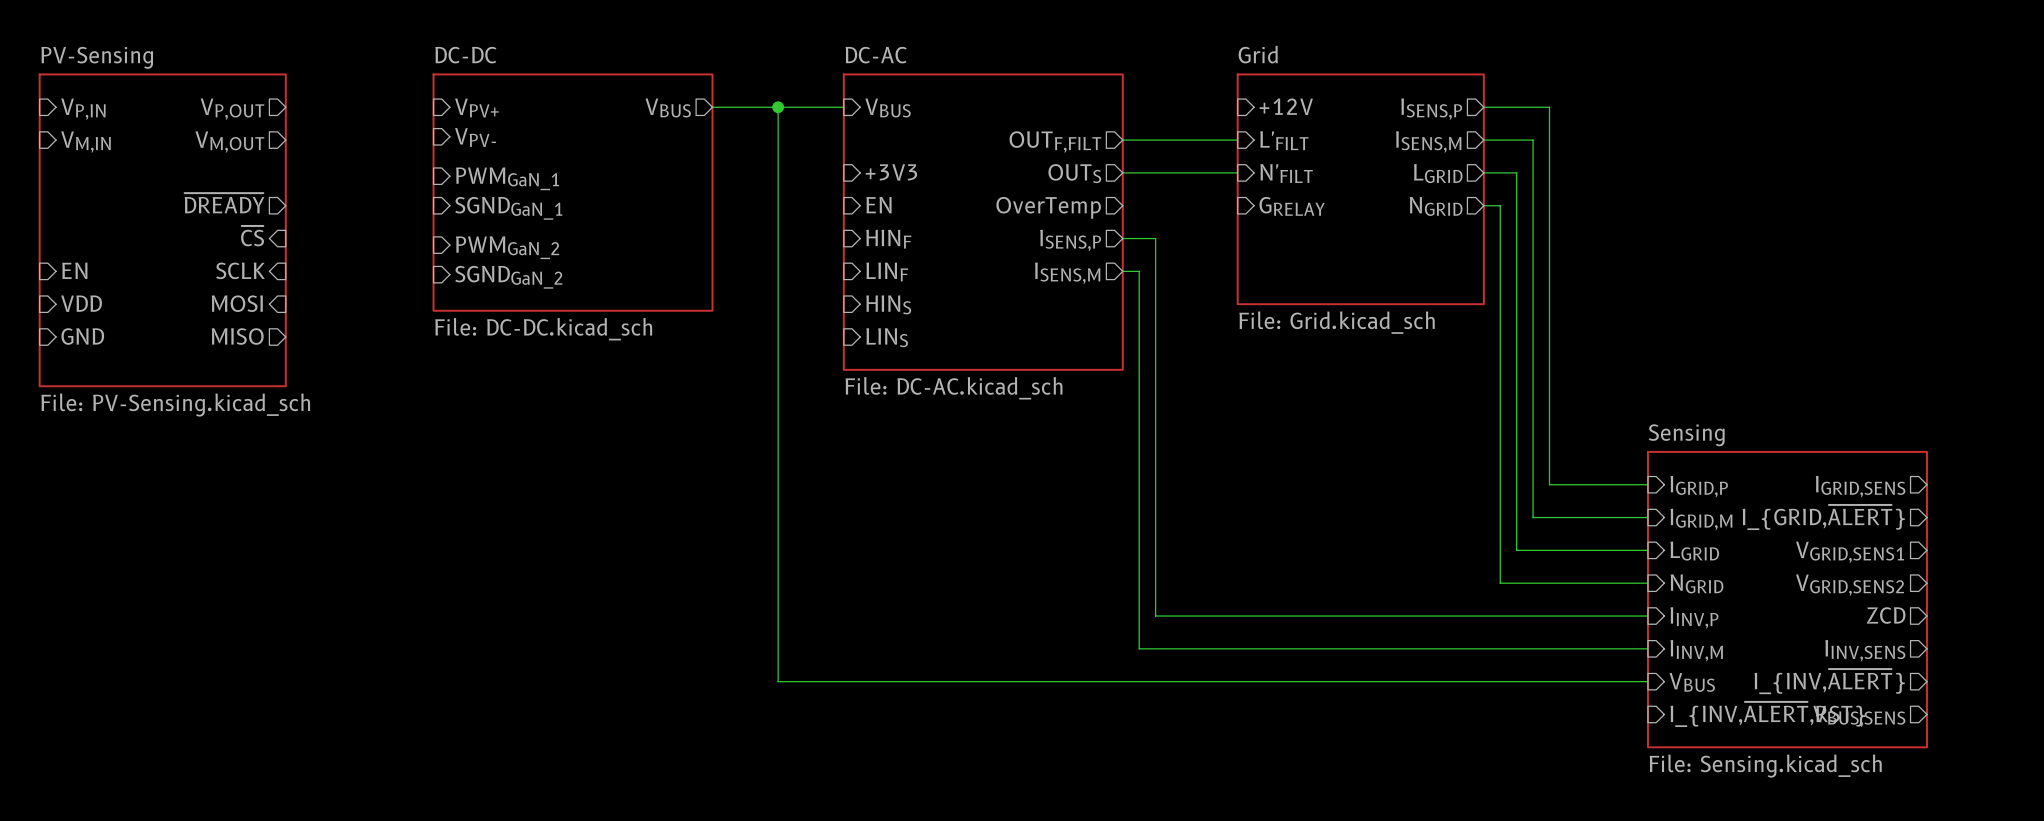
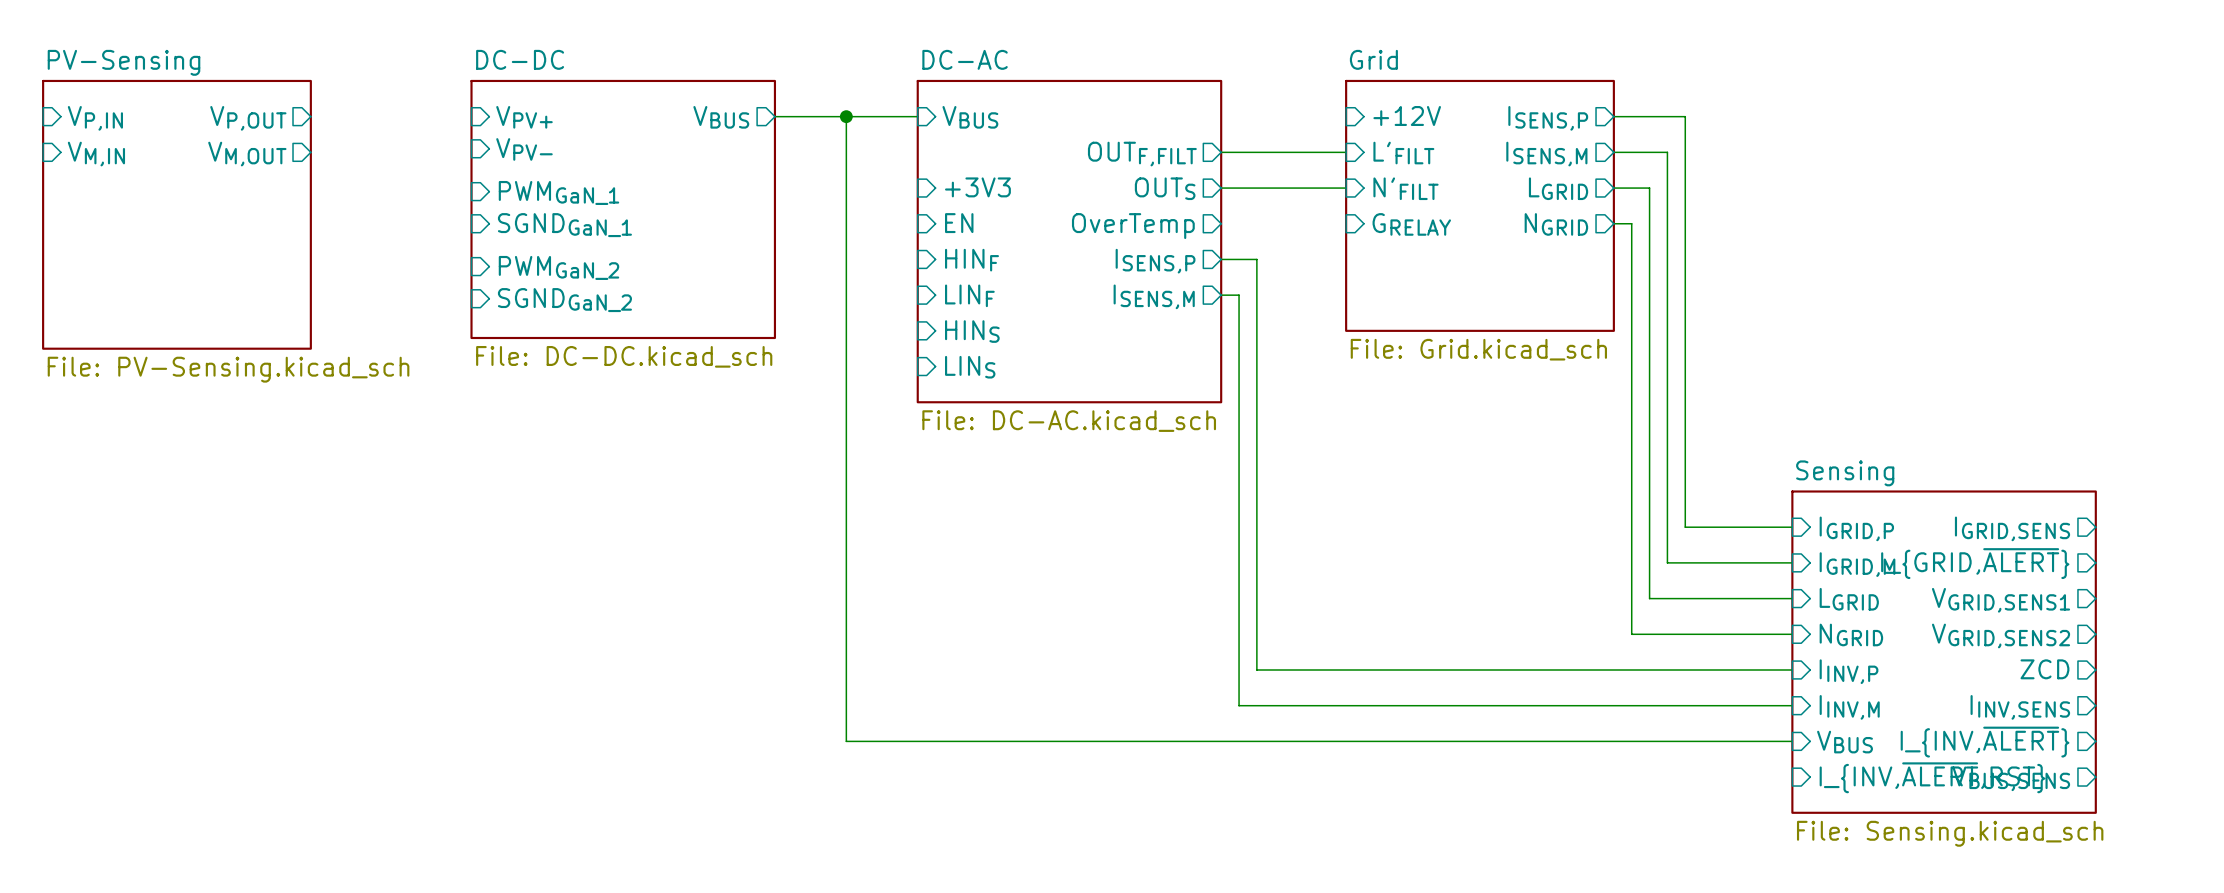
sheet PV-Sensing: none -> File: PV-Sensing.kicad_sch (176, 214)
sheet pin: ~{DREADY} (224, 203) -> none
sheet PV-Sensing: File: PV-Sensing.kicad_sch (162, 230) -> none
sheet pin: ~{CS} (252, 236) -> none
sheet pin: EN (74, 270) -> none
sheet pin: SCLK (240, 270) -> none
sheet pin: VDD (81, 303) -> none
sheet pin: MOSI (237, 303) -> none
sheet pin: GND (82, 336) -> none
sheet pin: MISO (237, 336) -> none

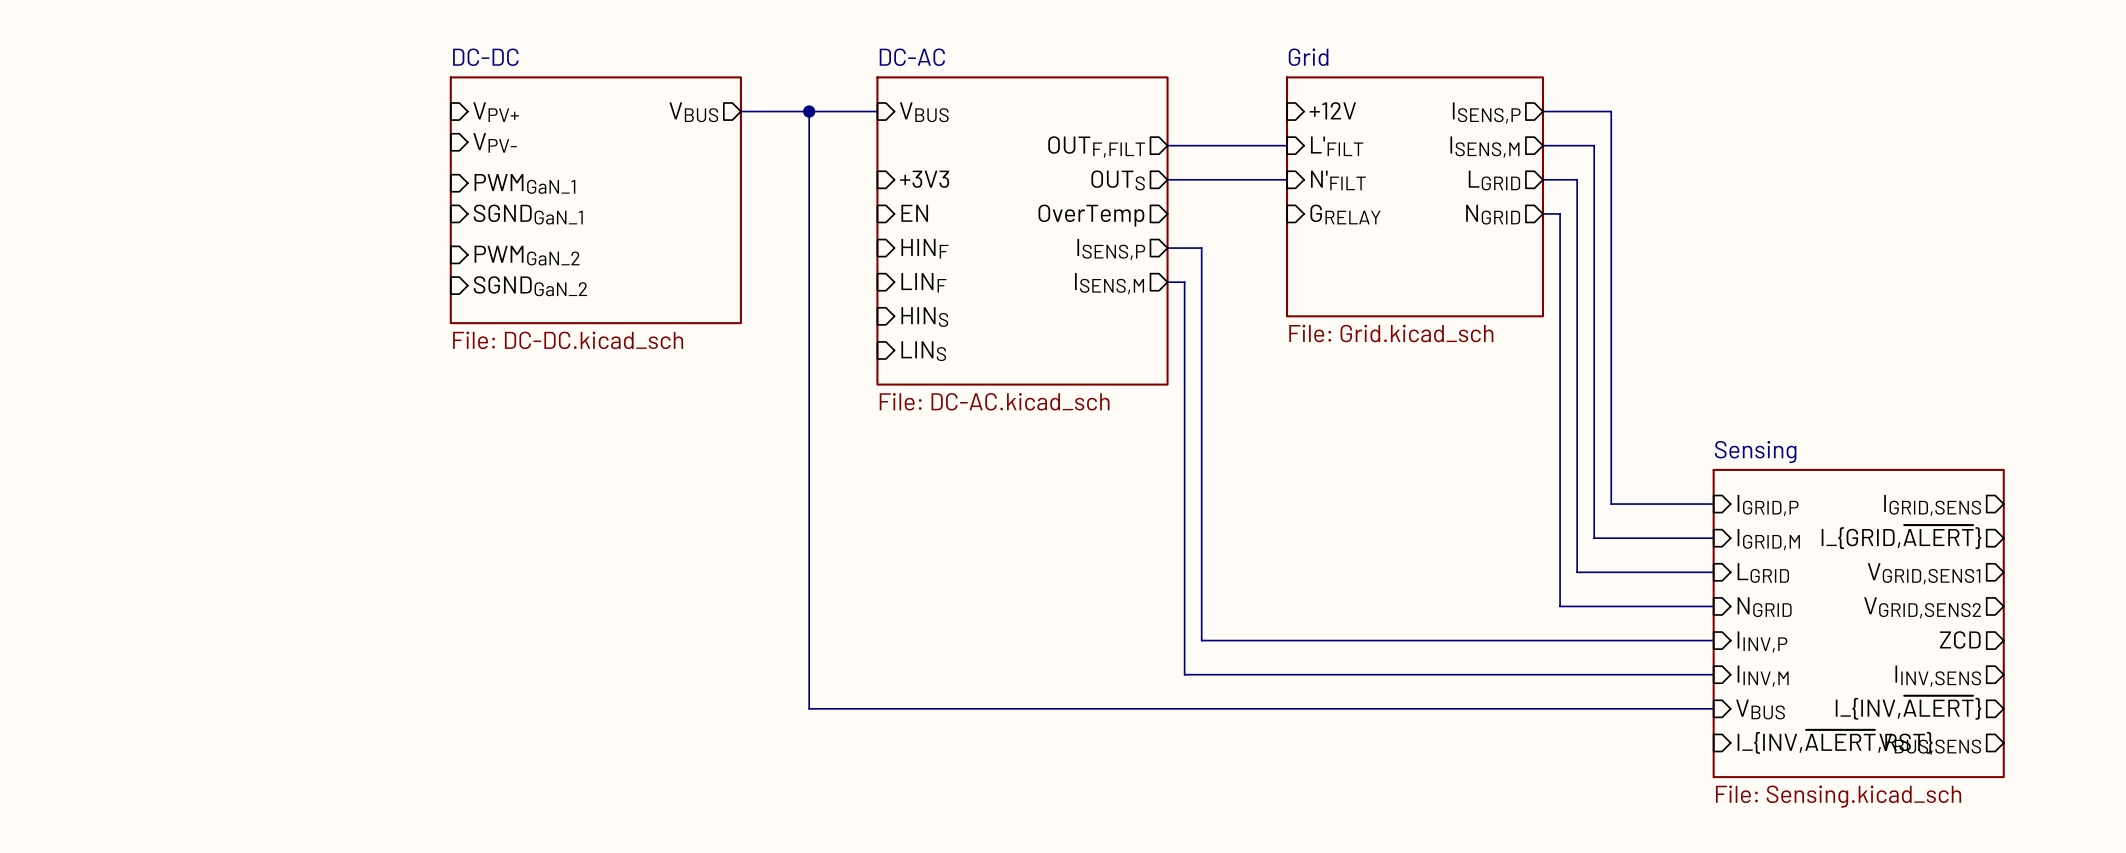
sheet pin: VP,IN (95, 118) -> none
sheet pin: VP,OUT (248, 118) -> none
sheet pin: VM,IN (96, 154) -> none
sheet pin: VM,OUT (247, 154) -> none
sheet PV-Sensing: File: PV-Sensing.kicad_sch (176, 214) -> none

